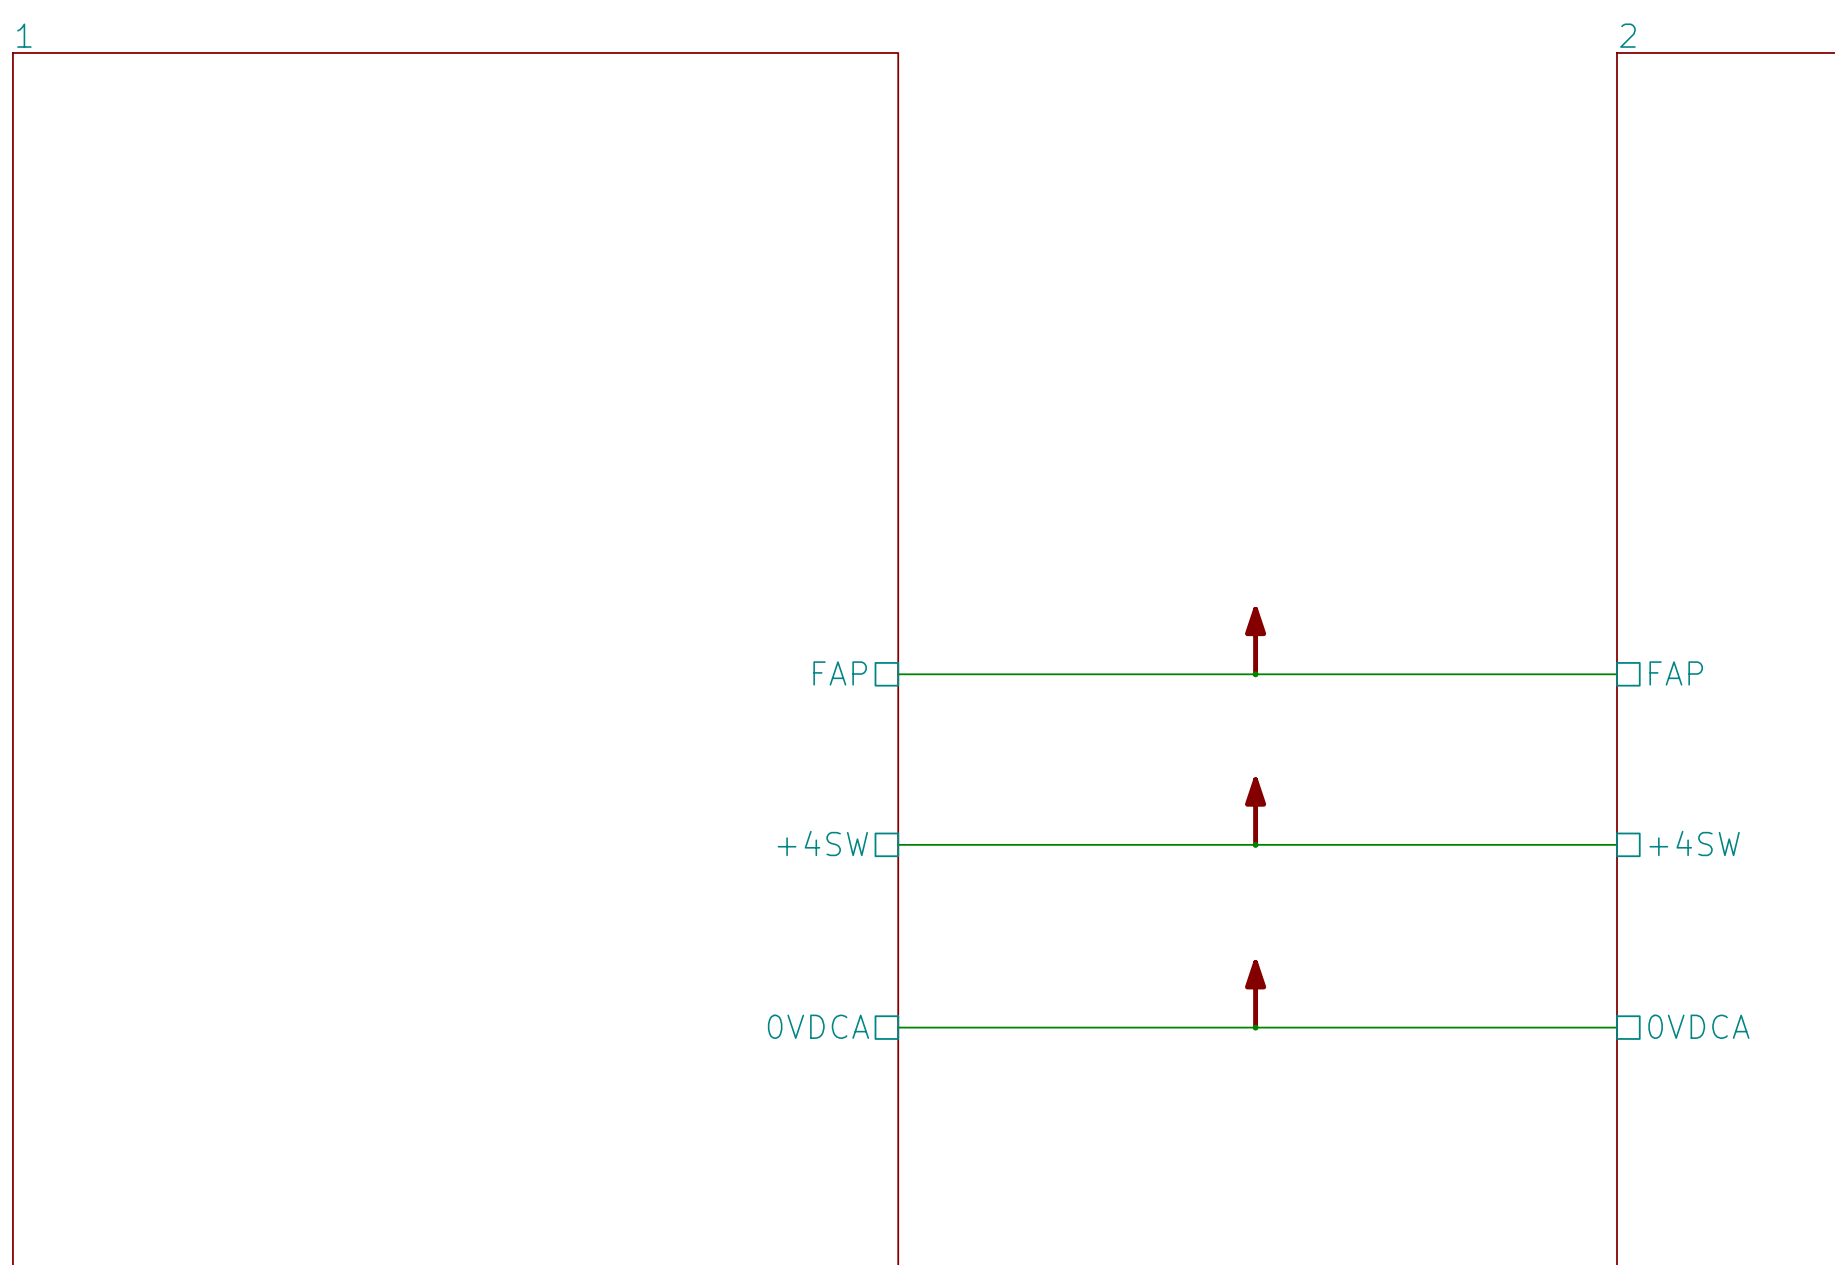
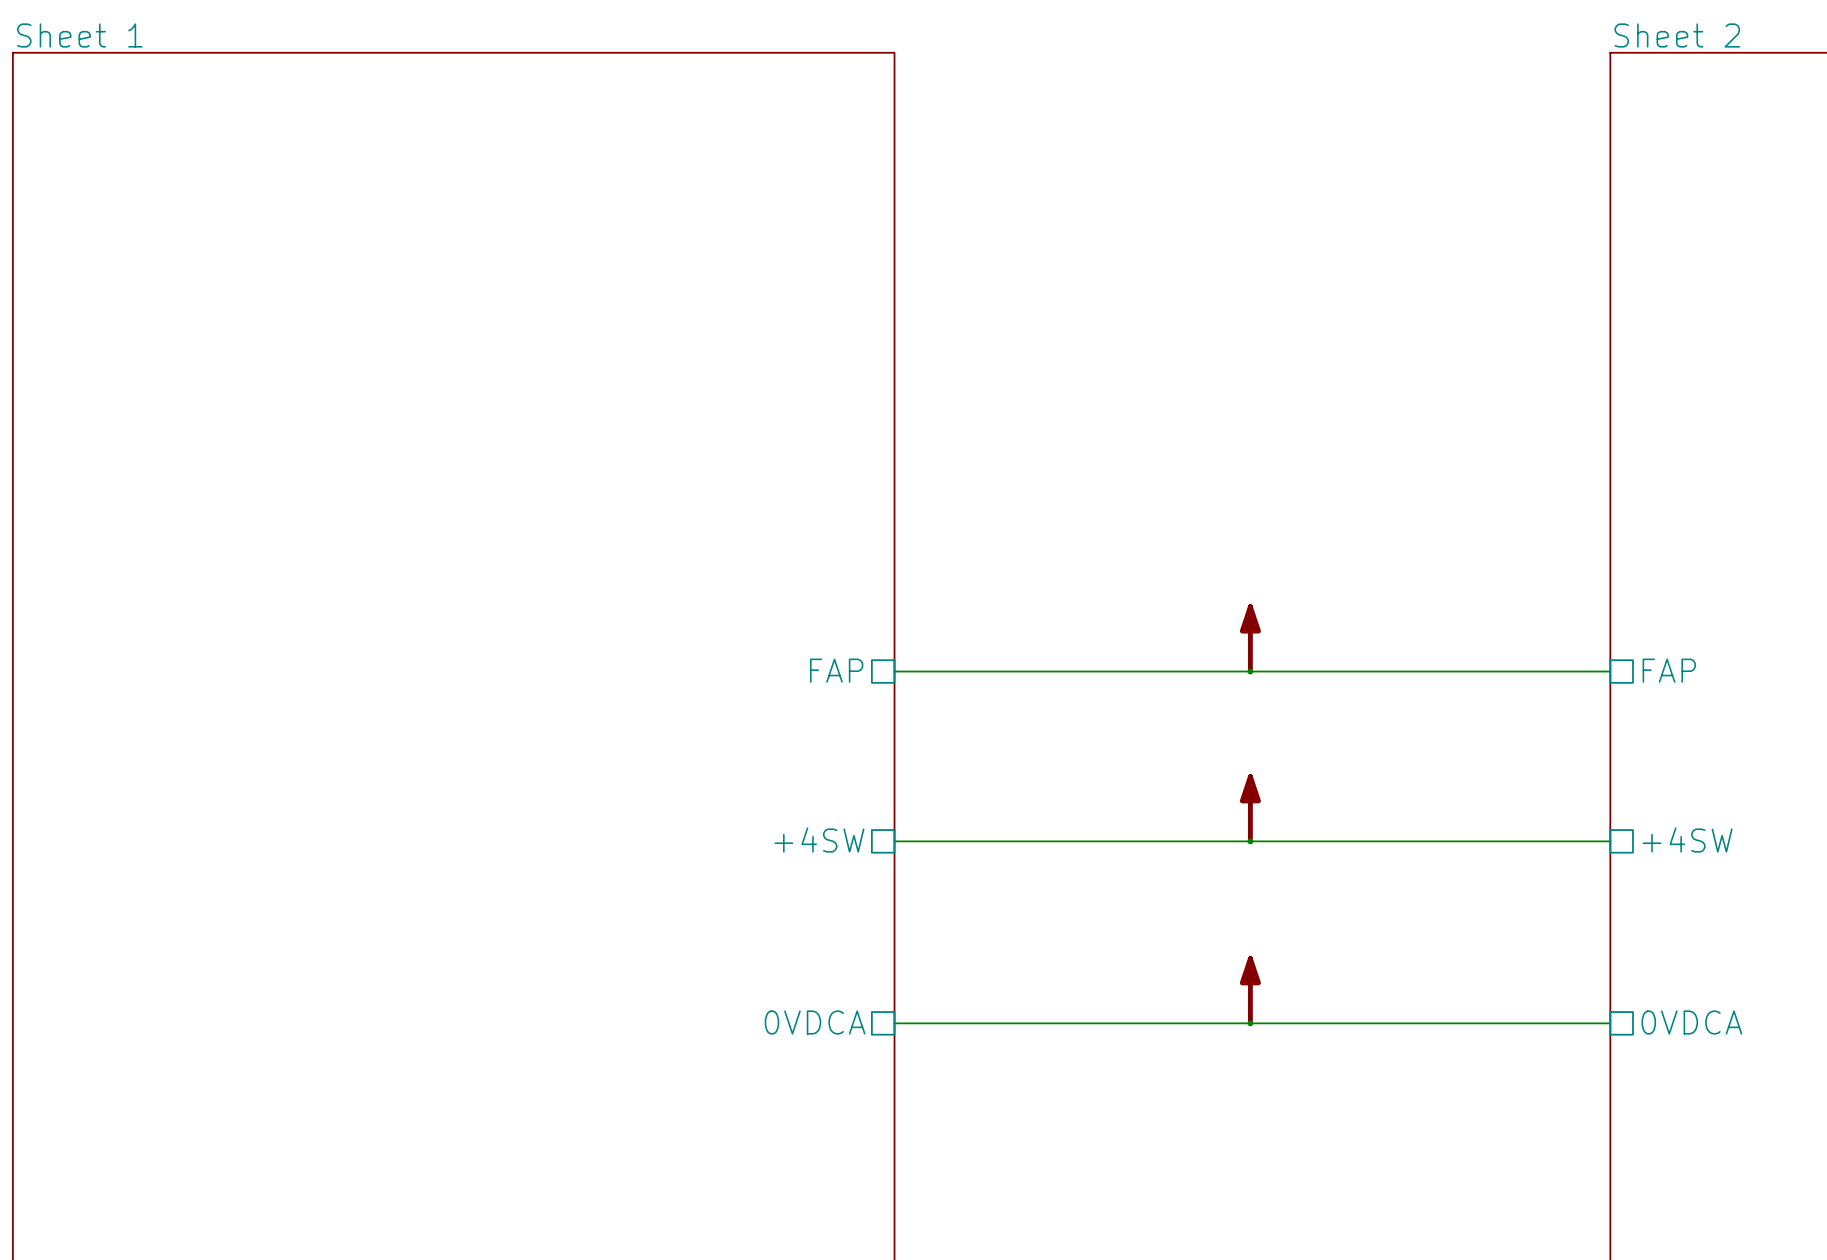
sheet 1 name: 1 (24, 35) -> Sheet 1 (79, 35)
sheet 2 name: 2 (1627, 35) -> Sheet 2 (1677, 35)

